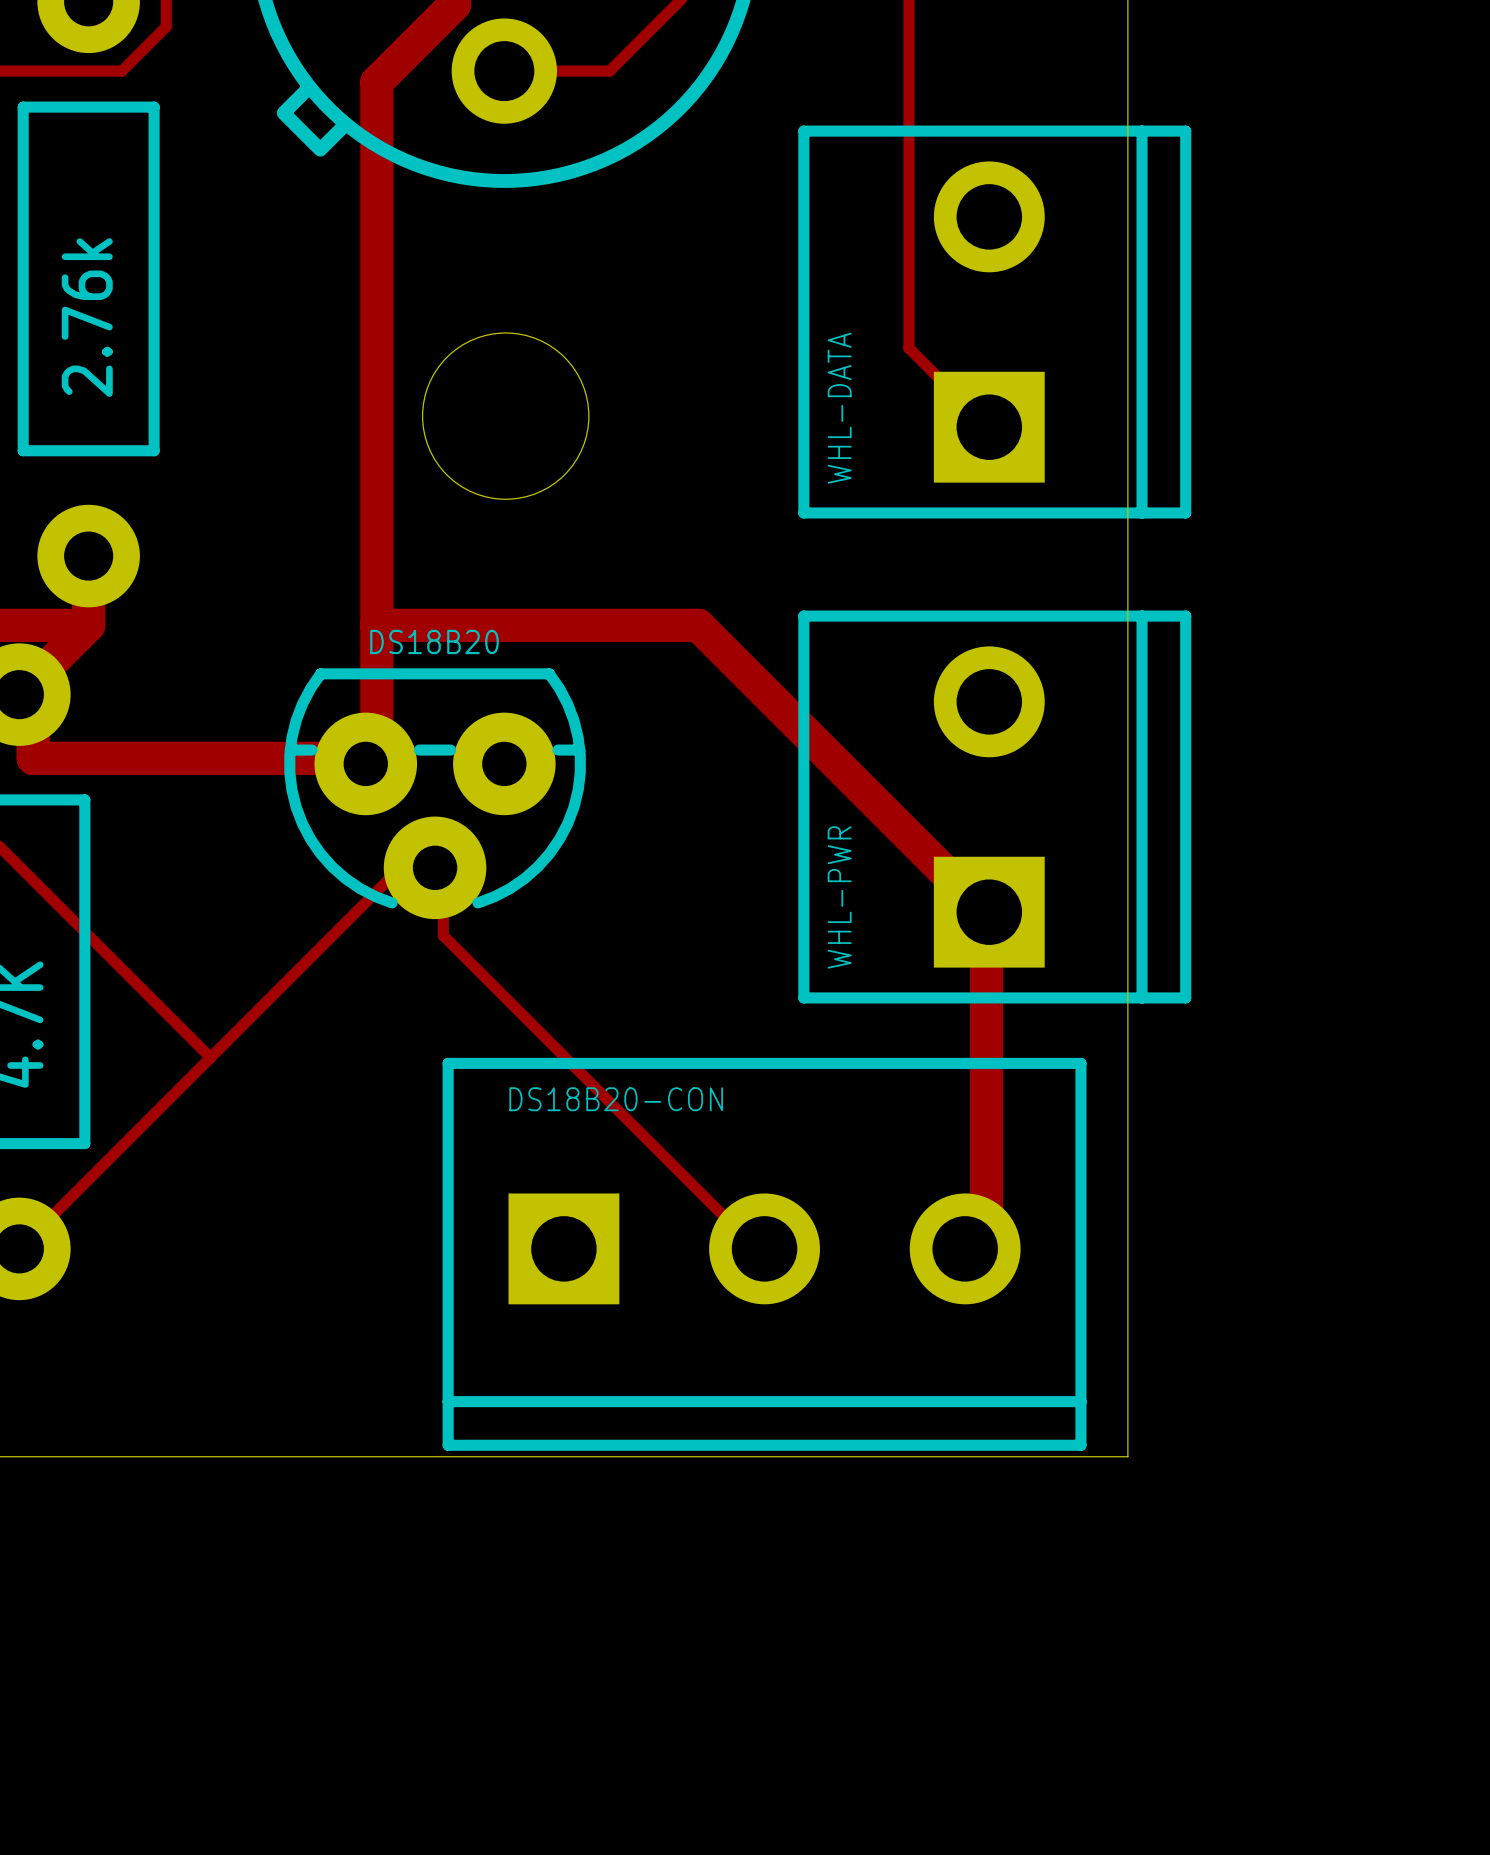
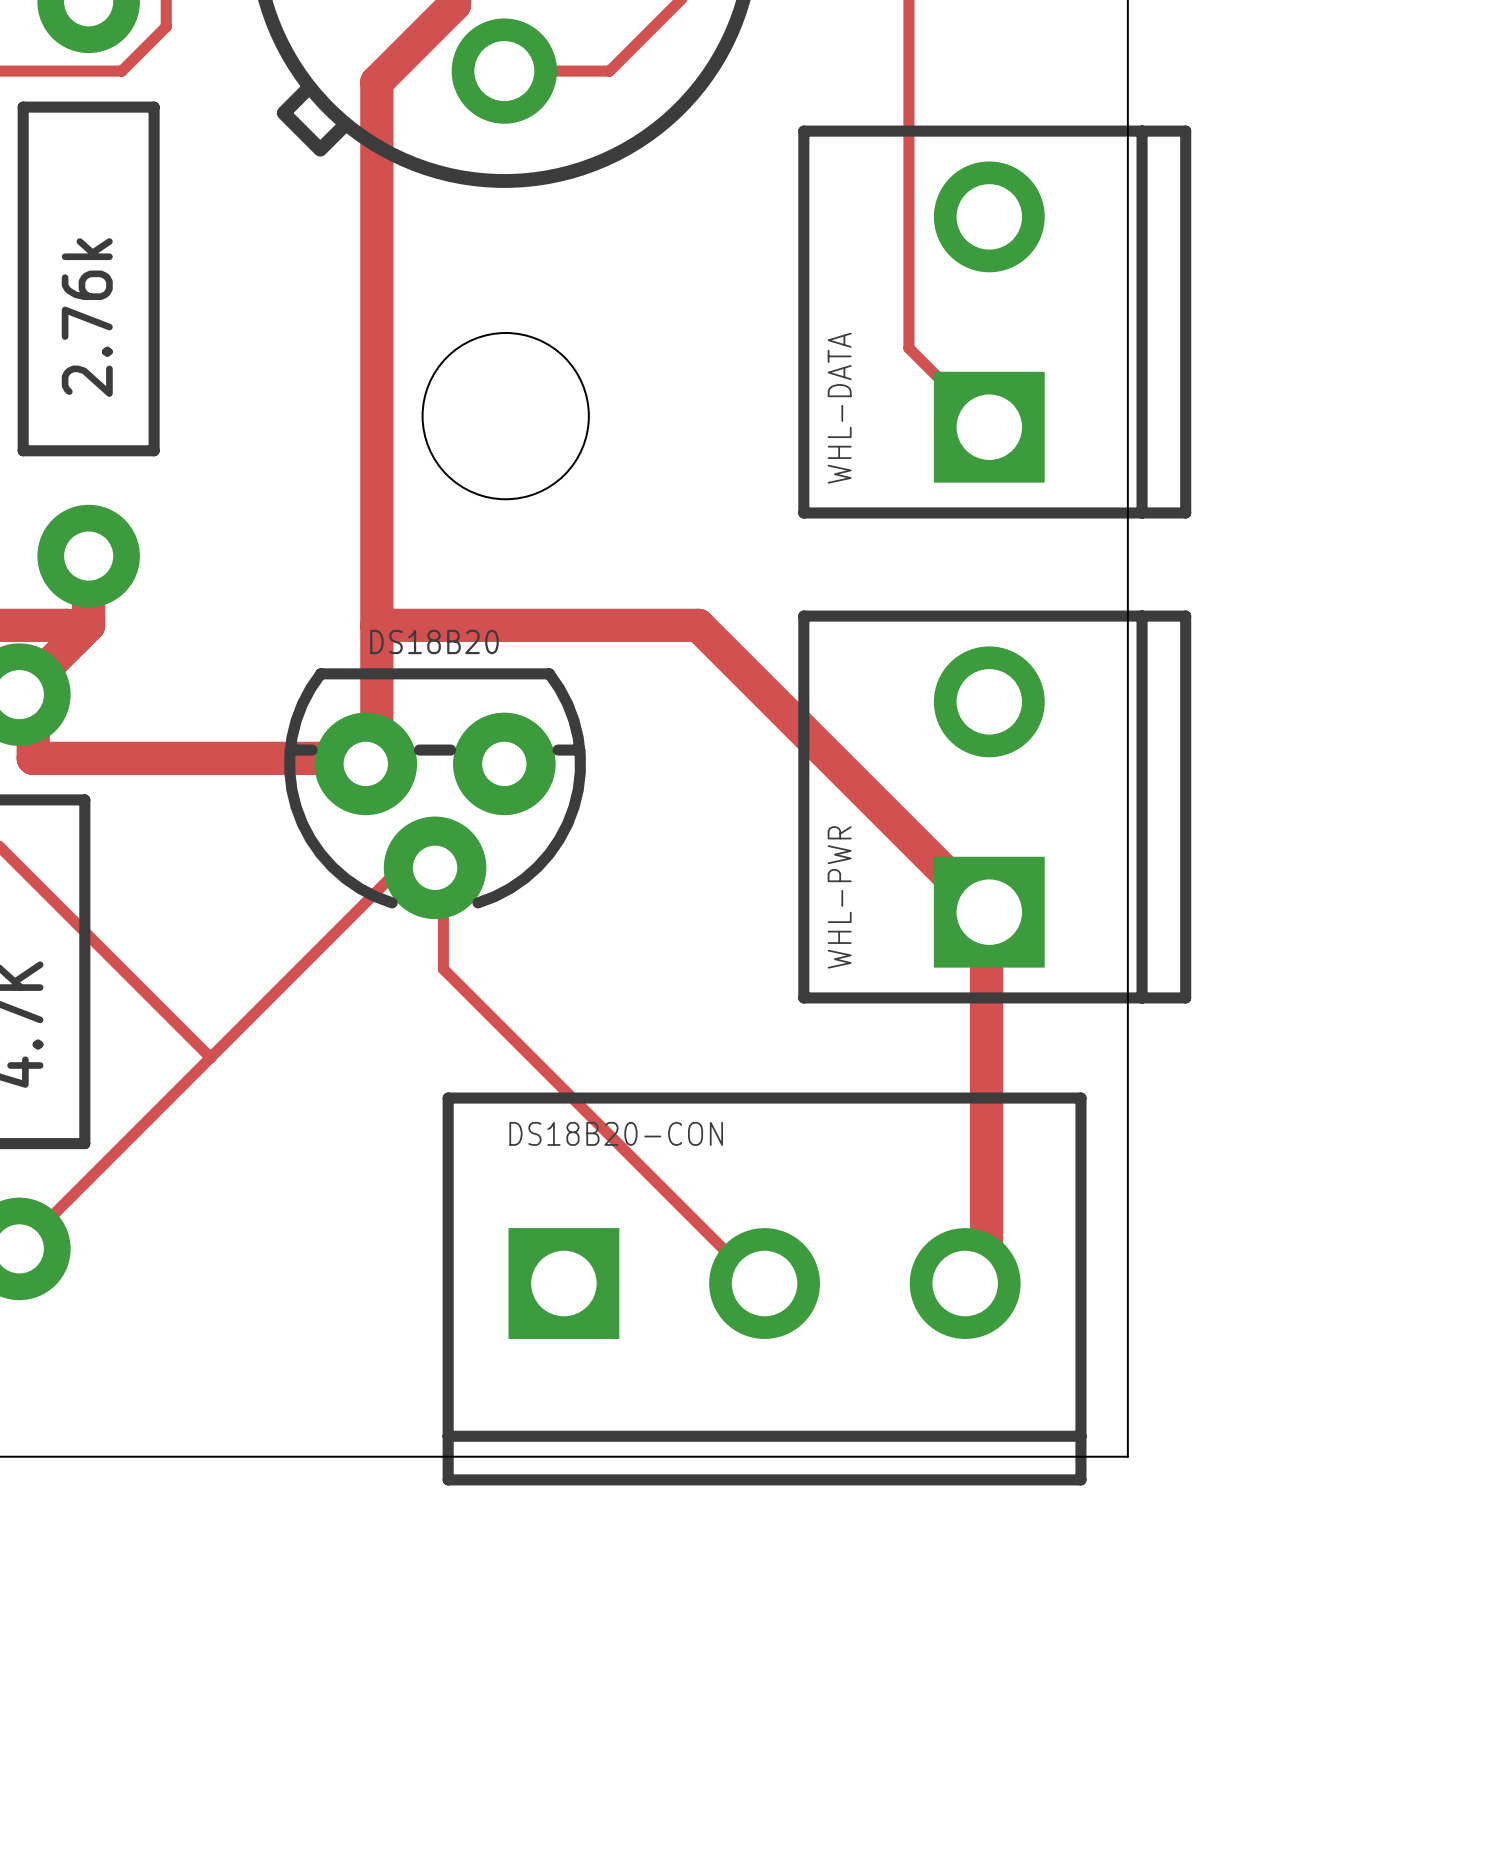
track: (443, 935) (753, 1246) (764, 1248) -> (443, 935) (443, 968) (753, 1279) (764, 1283)
DS18B20-CON position: (764, 1254) -> (764, 1288)

